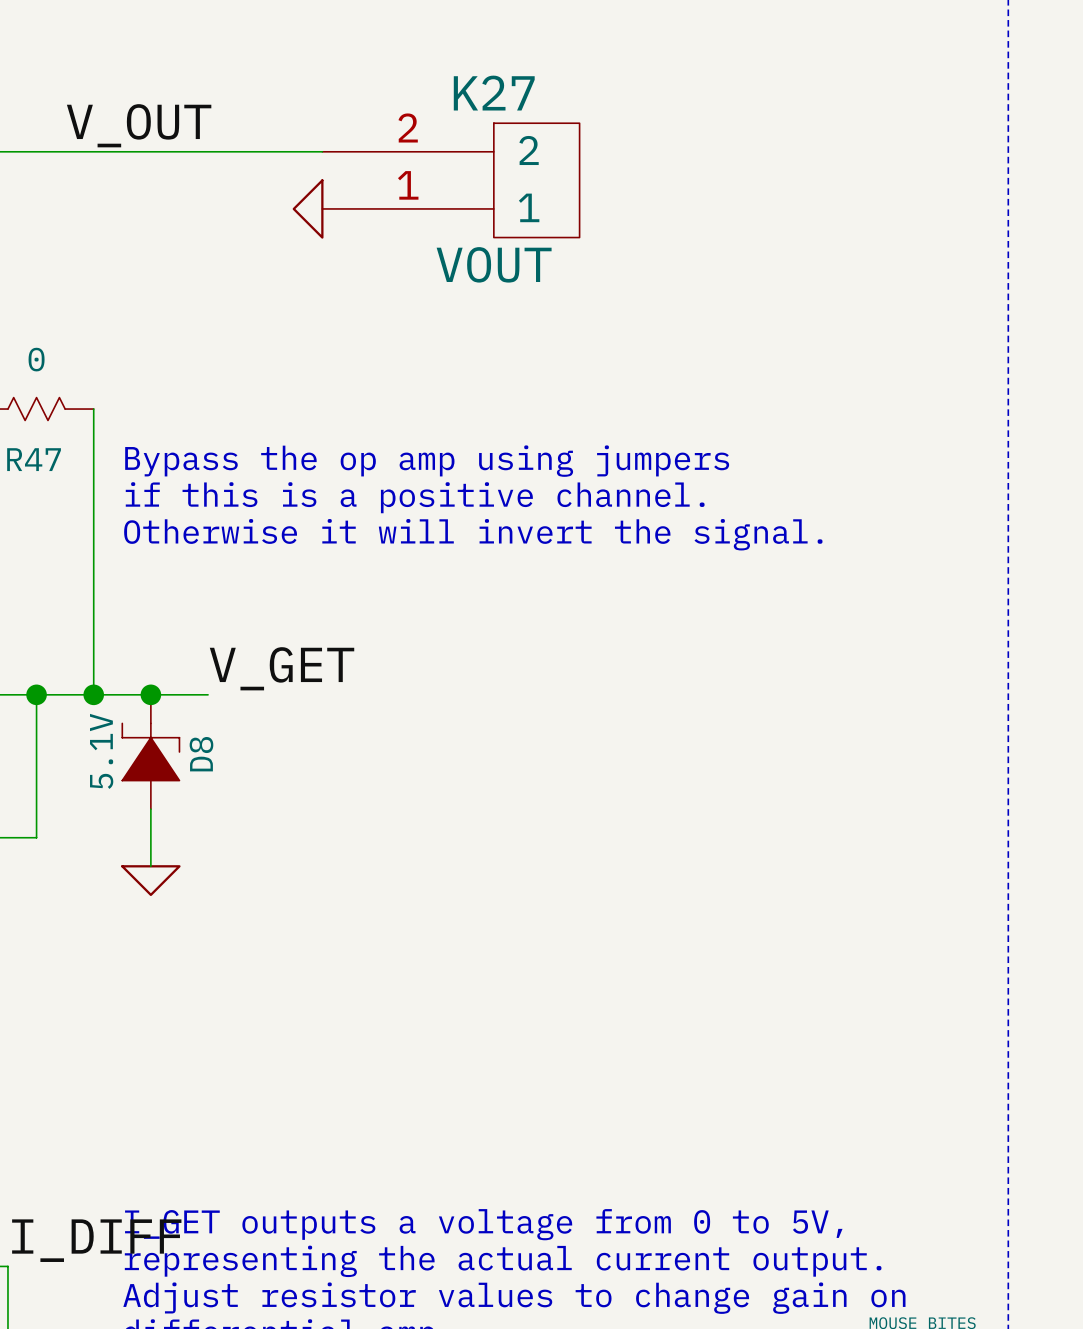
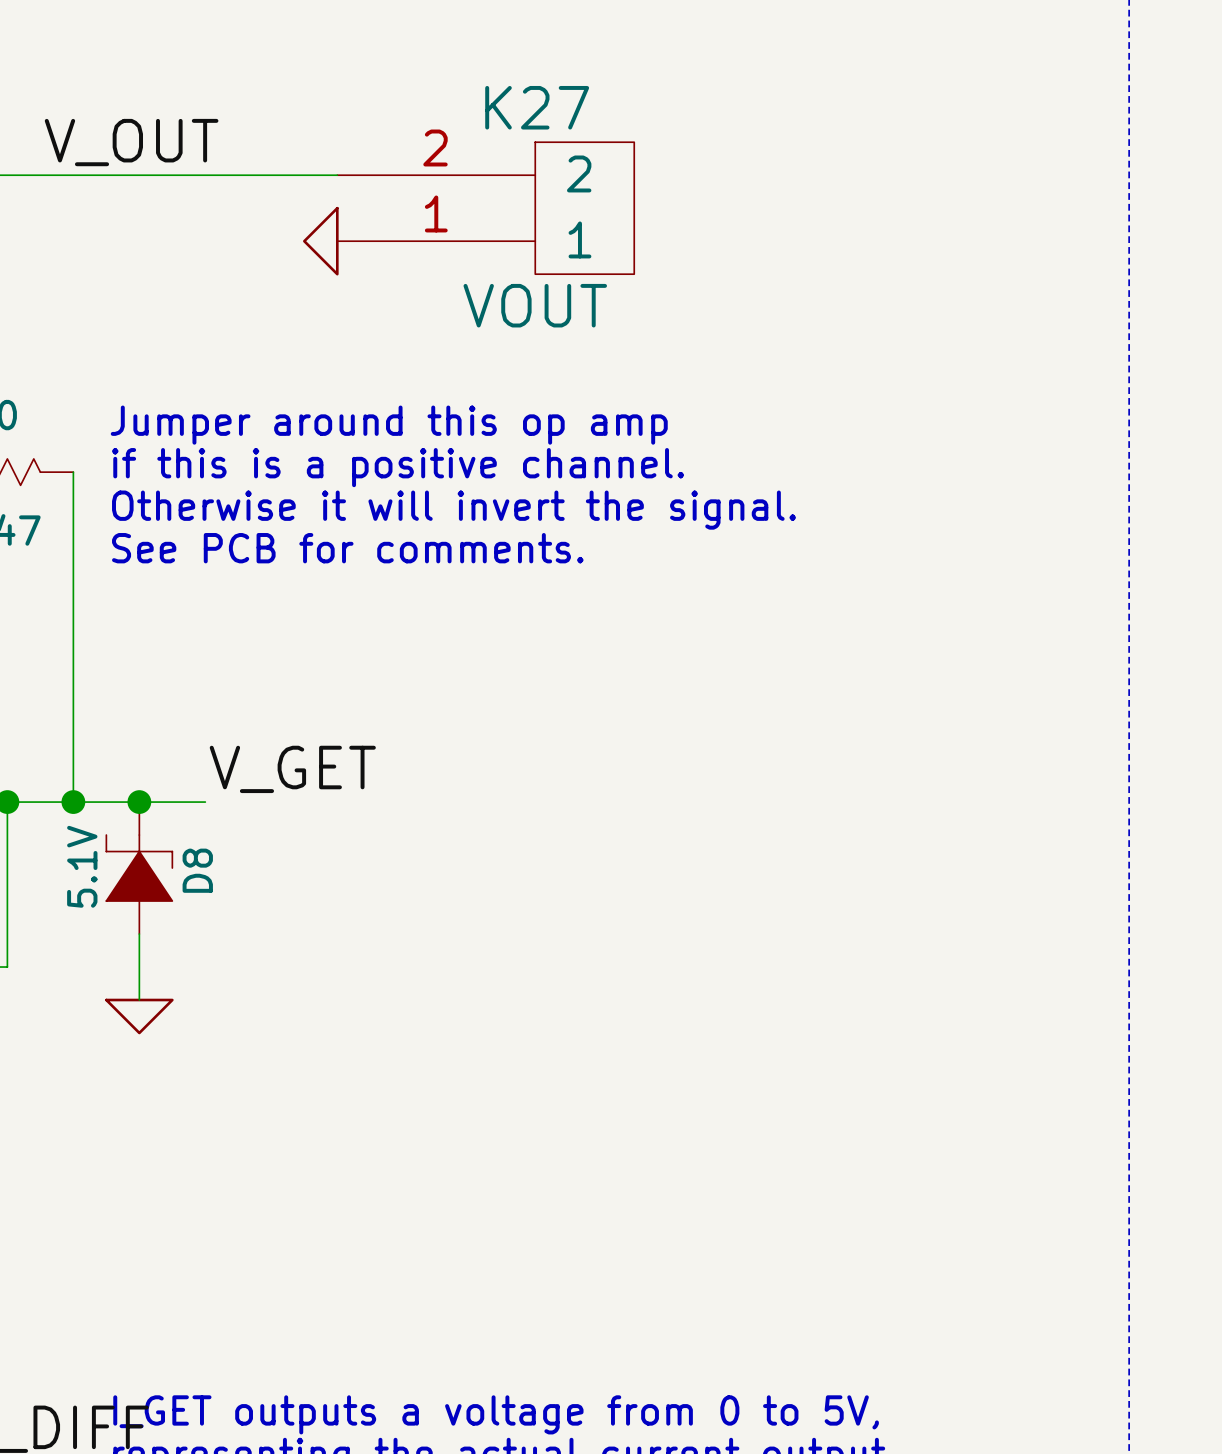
text: none -> Jumper around this op amp (389, 425)
text: Bypass the op amp using jumpers (427, 461) -> See PCB for comments. (347, 548)
text position: if this is a positive channel. (415, 497) -> if this is a positive channel. (398, 467)
text position: Otherwise it will invert the signal. (473, 534) -> Otherwise it will invert the signal. (453, 510)

